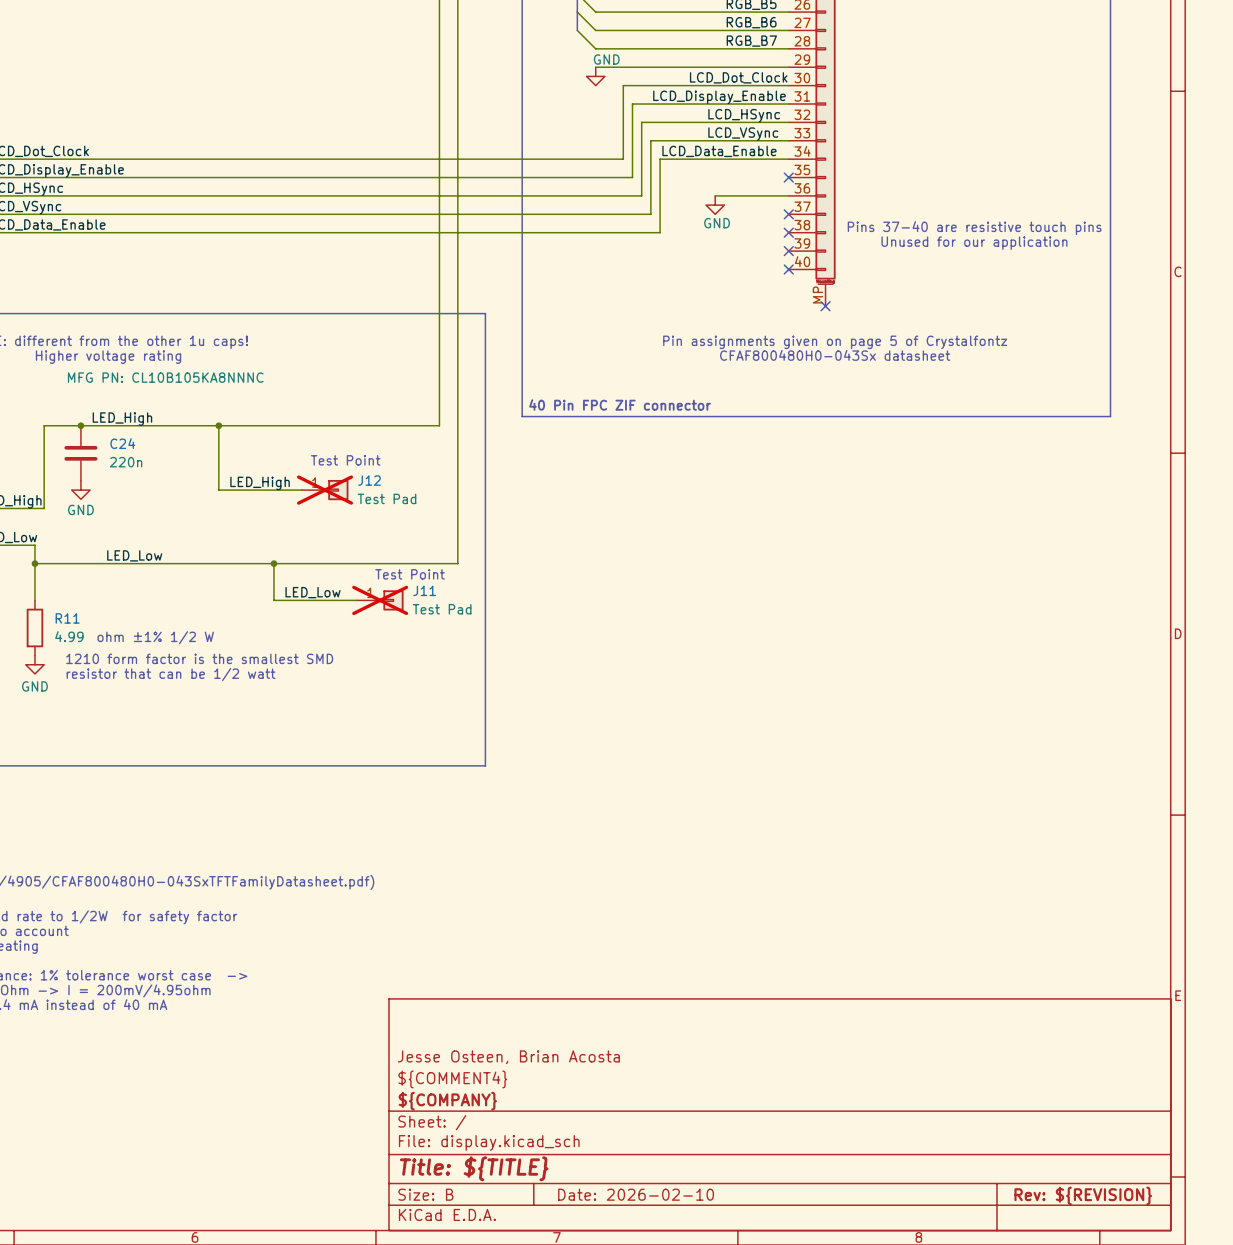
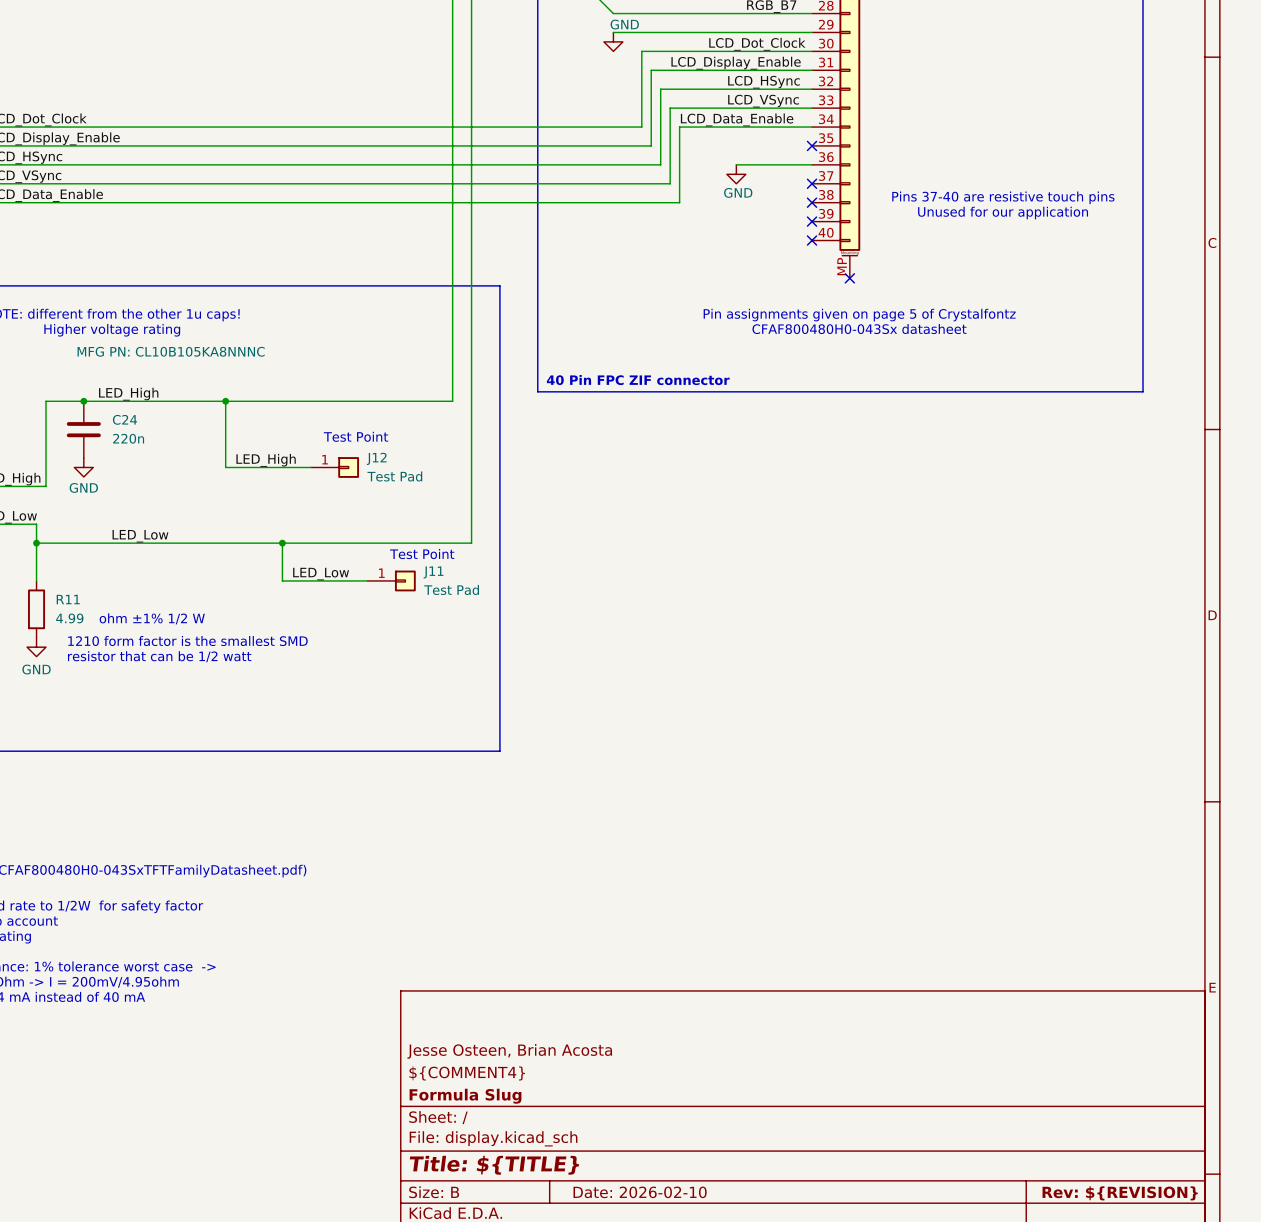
J12 do-not-place cross: (325, 490) -> none
J11 do-not-place cross: (380, 600) -> none
title block: ${COMPANY} (447, 1101) -> Formula Slug (465, 1096)

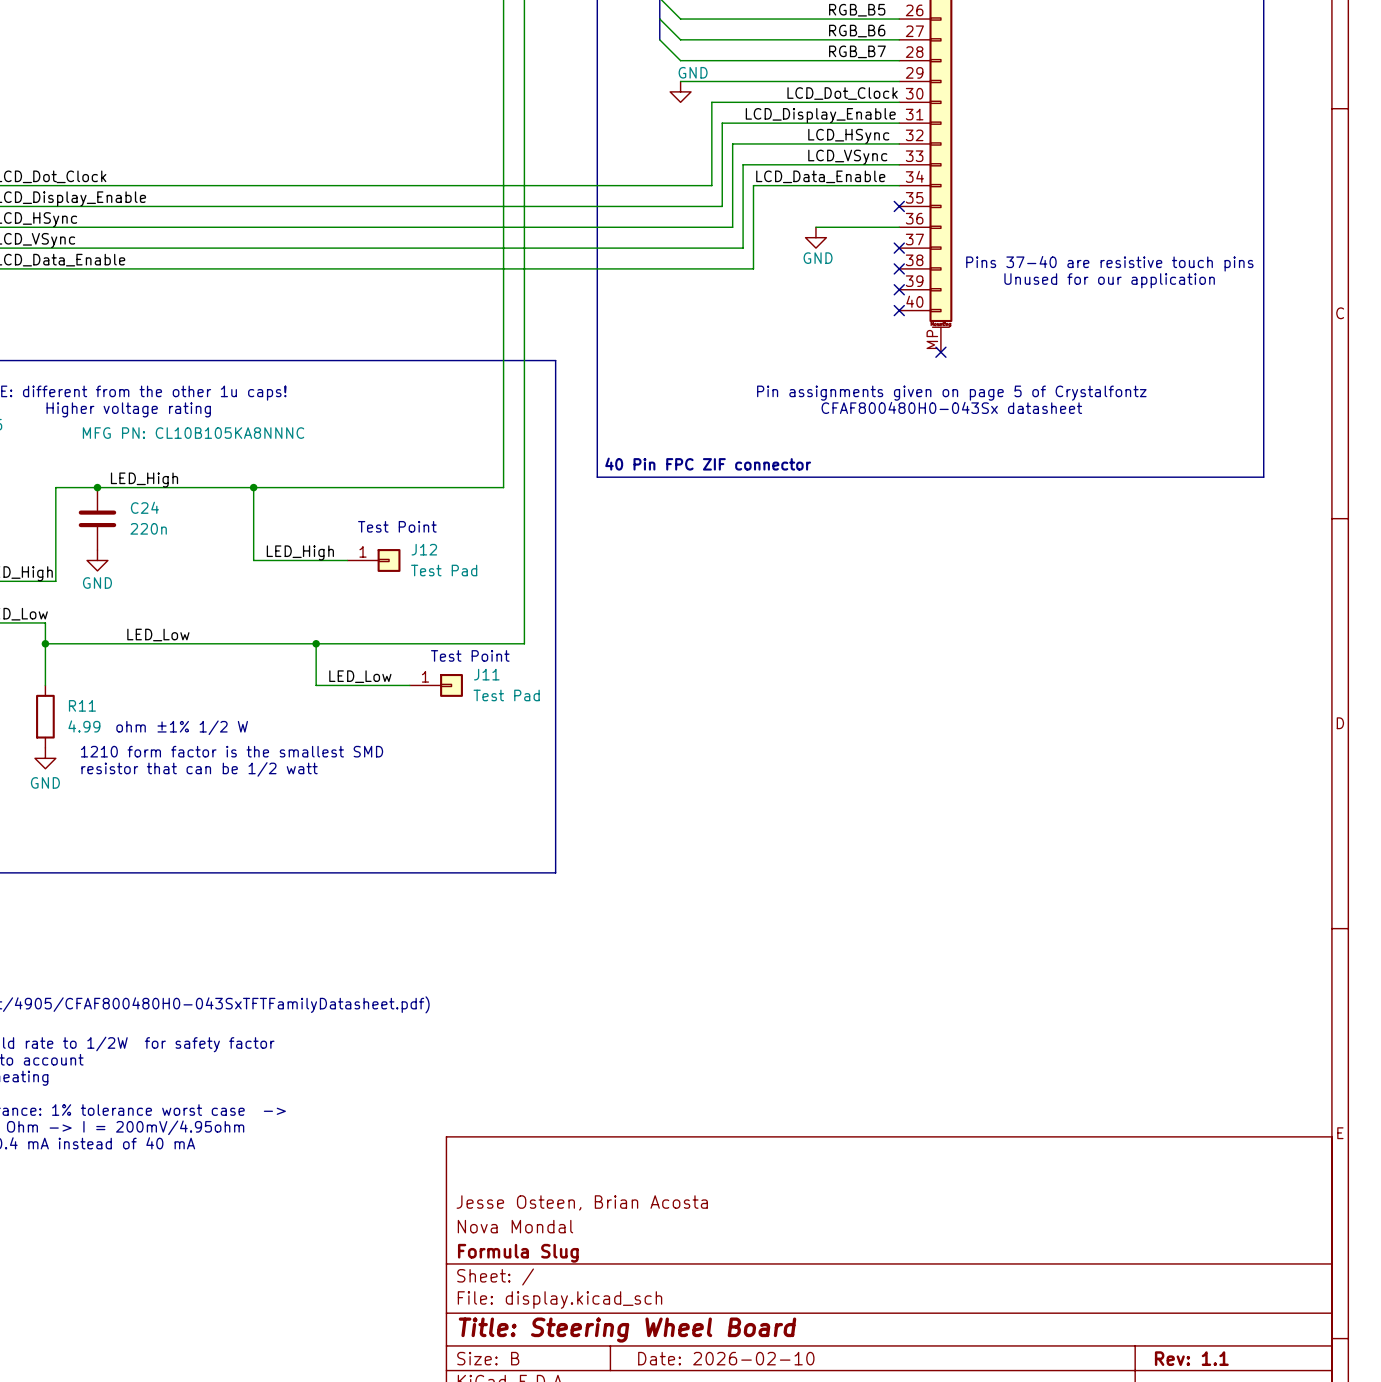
title block: ${COMMENT4} (467, 1073) -> Nova Mondal (515, 1226)
title block: Title: ${TITLE} (494, 1165) -> Title: Steering Wheel Board (627, 1330)
title block: Rev: ${REVISION} (1120, 1193) -> Rev: 1.1 (1191, 1358)

